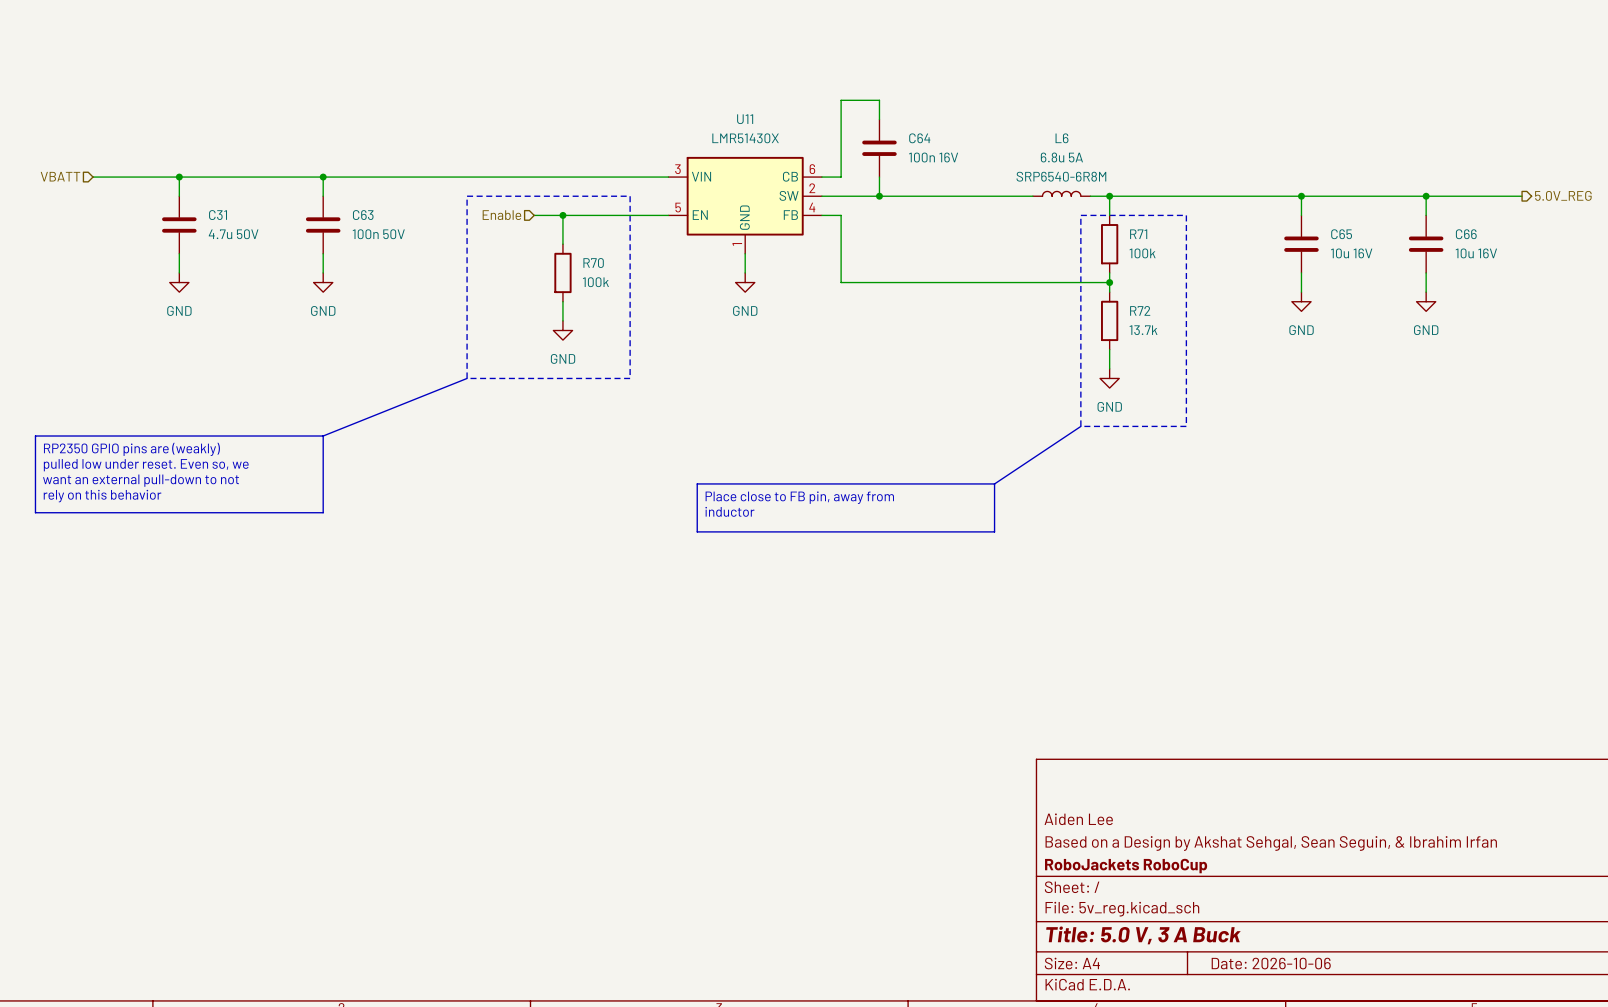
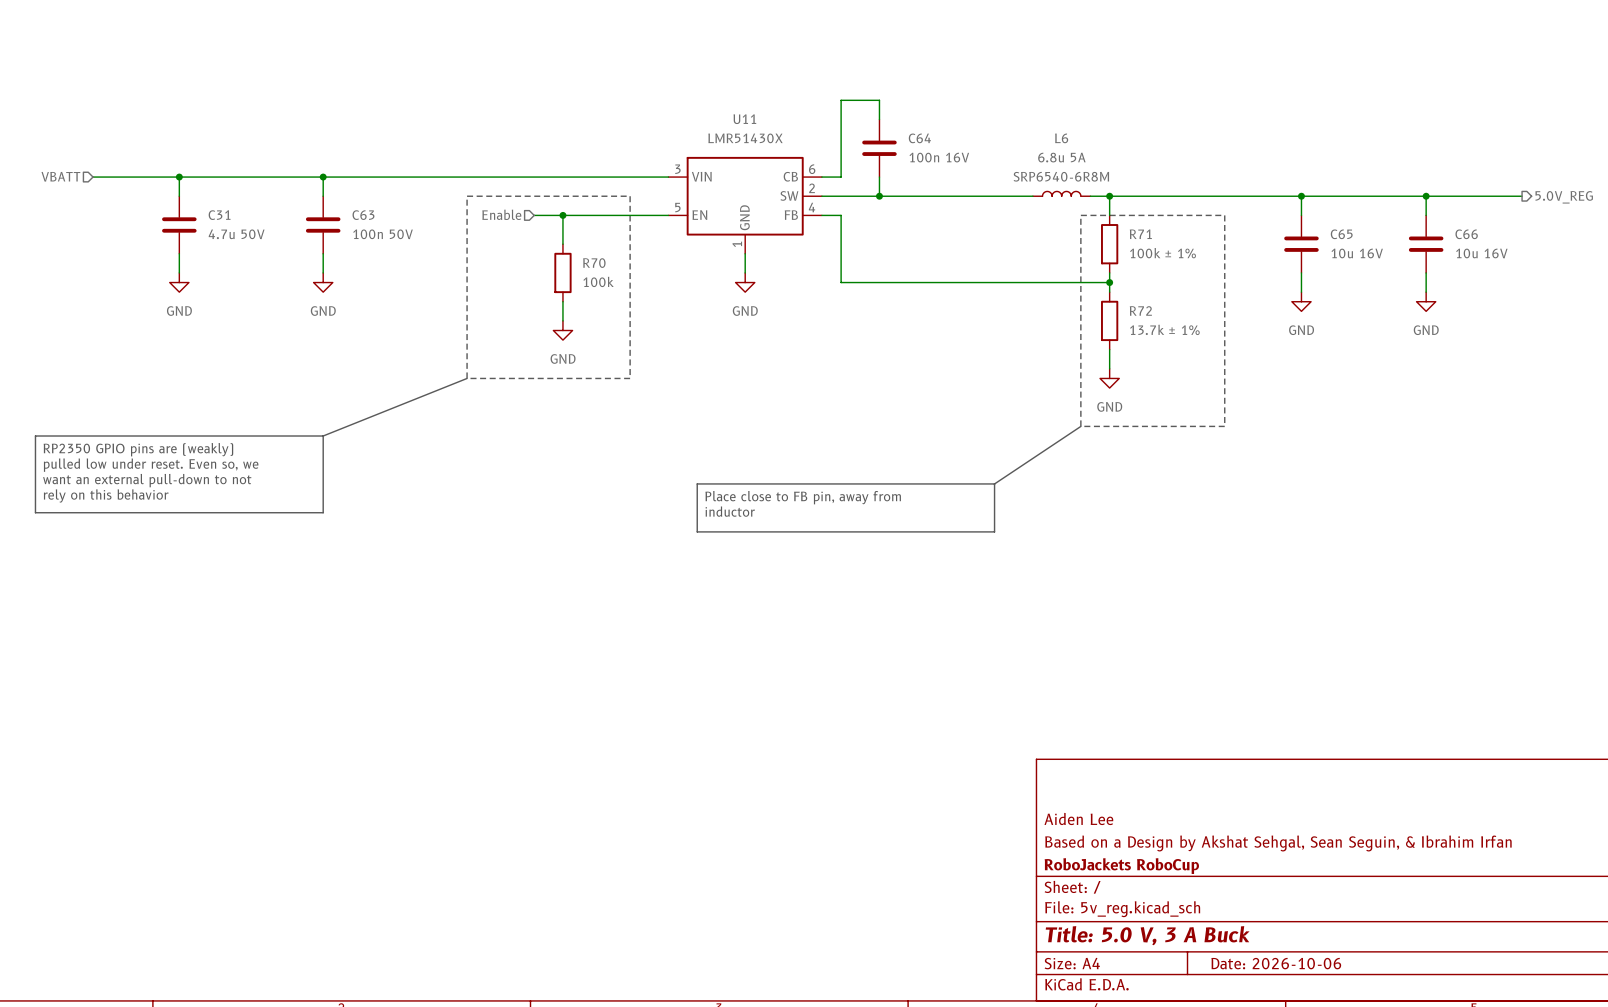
line: (1186, 215) (1186, 426) -> (1186, 215) (1224, 215) (1224, 426) (1186, 426)
R71 value: 100k (1142, 253) -> 100k ± 1% (1162, 253)
R72 value: 13.7k (1143, 330) -> 13.7k ± 1% (1164, 329)

